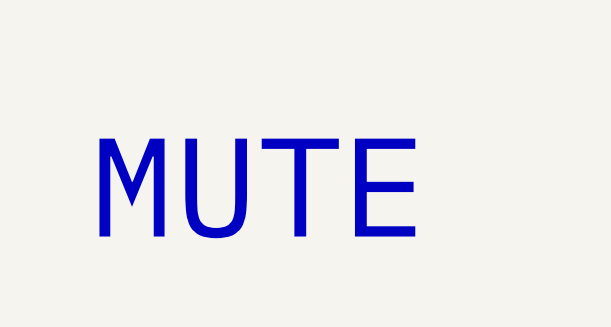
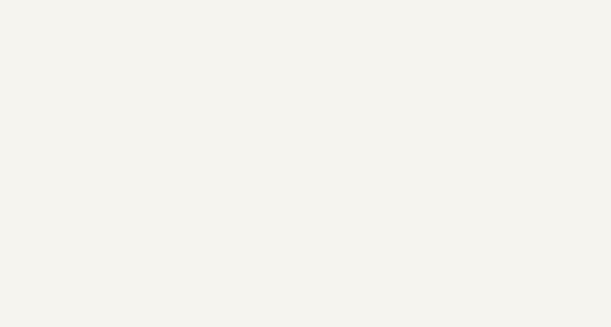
text: MUTE (257, 188) -> none

